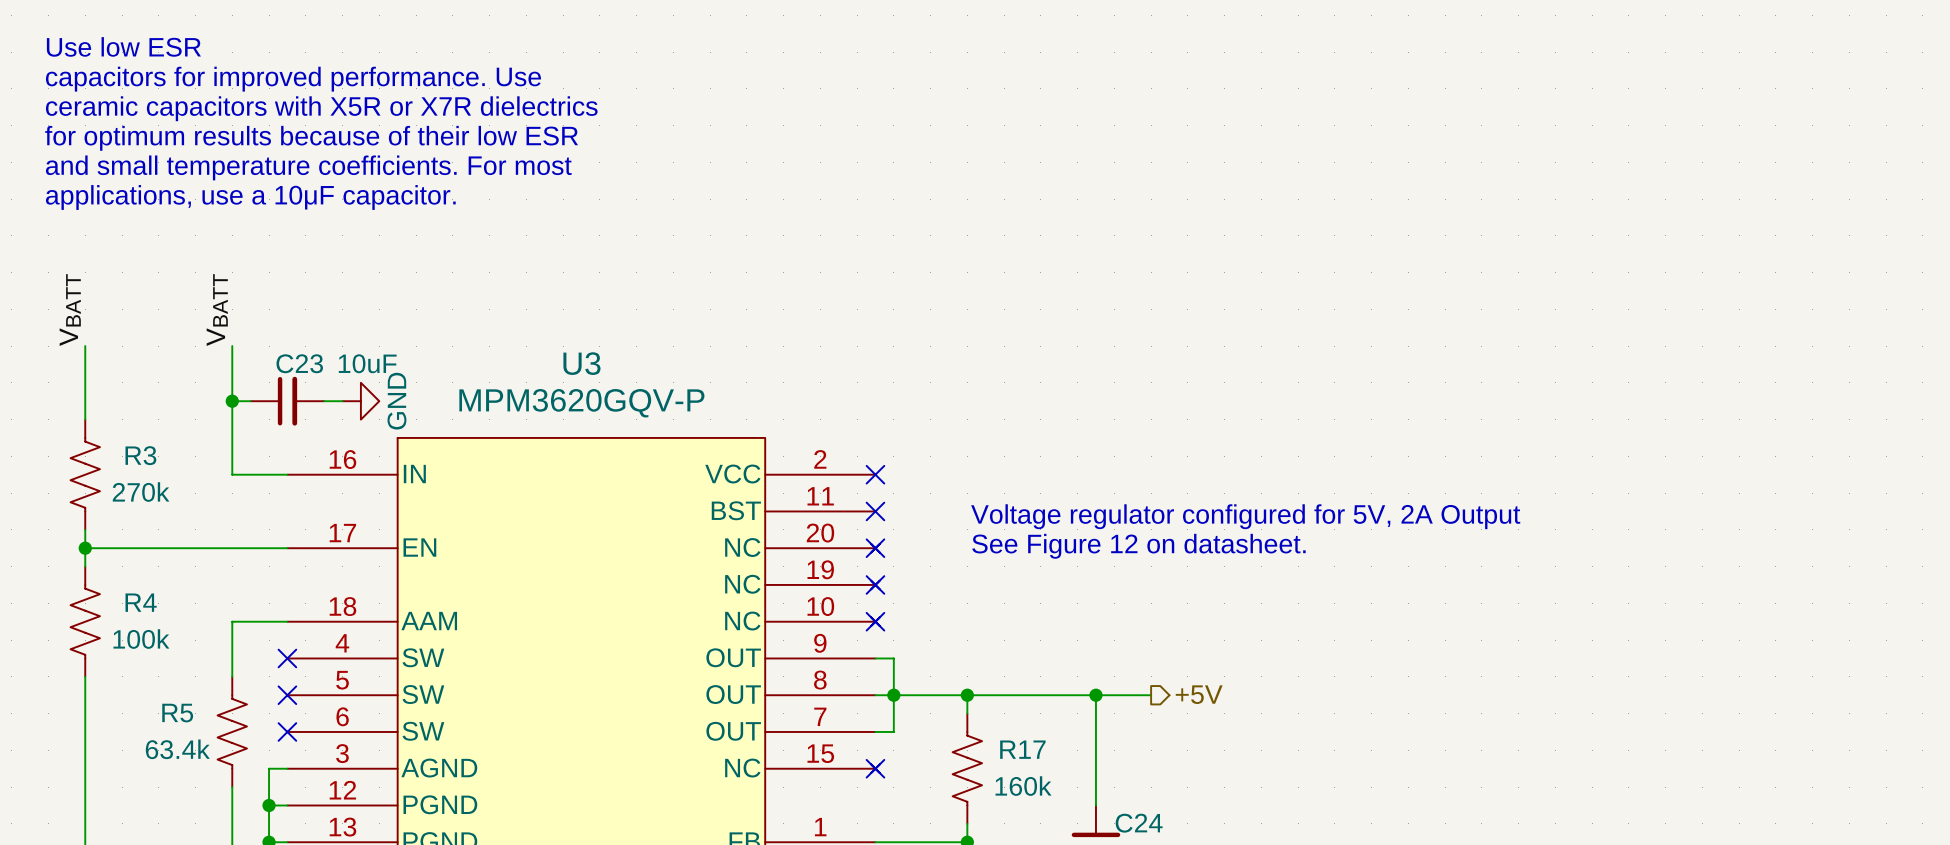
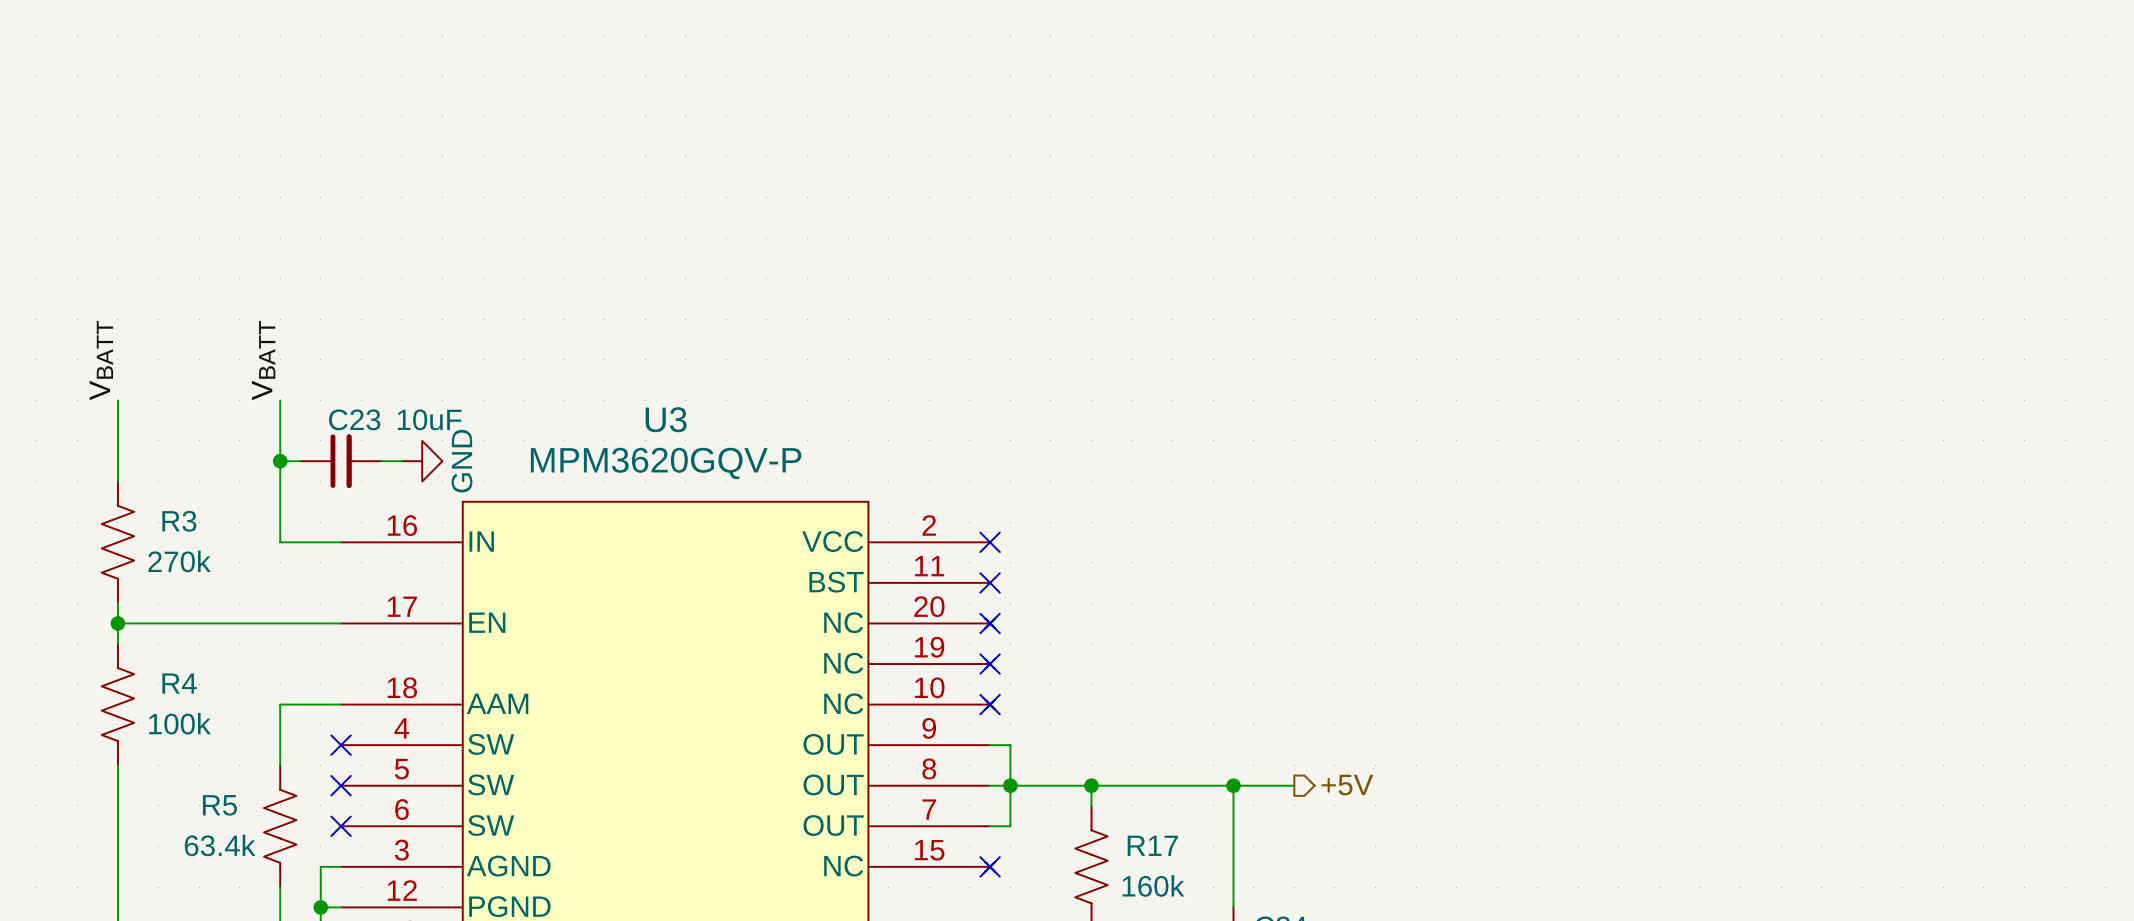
text: Use low ESR (123, 46) -> none
text: capacitors for improved performance. Use (293, 79) -> none
text: ceramic capacitors with X5R or X7R dielectrics (321, 108) -> none
text: for optimum results because of their low ESR (311, 138) -> none
text: and small temperature coefficients. For most (308, 167) -> none
text: applications, use a 10μF capacitor. (250, 197) -> none
text: Voltage regulator configured for 5V, 2A Output (1245, 516) -> none
text: See Figure 12 on datasheet. (1138, 546) -> none

